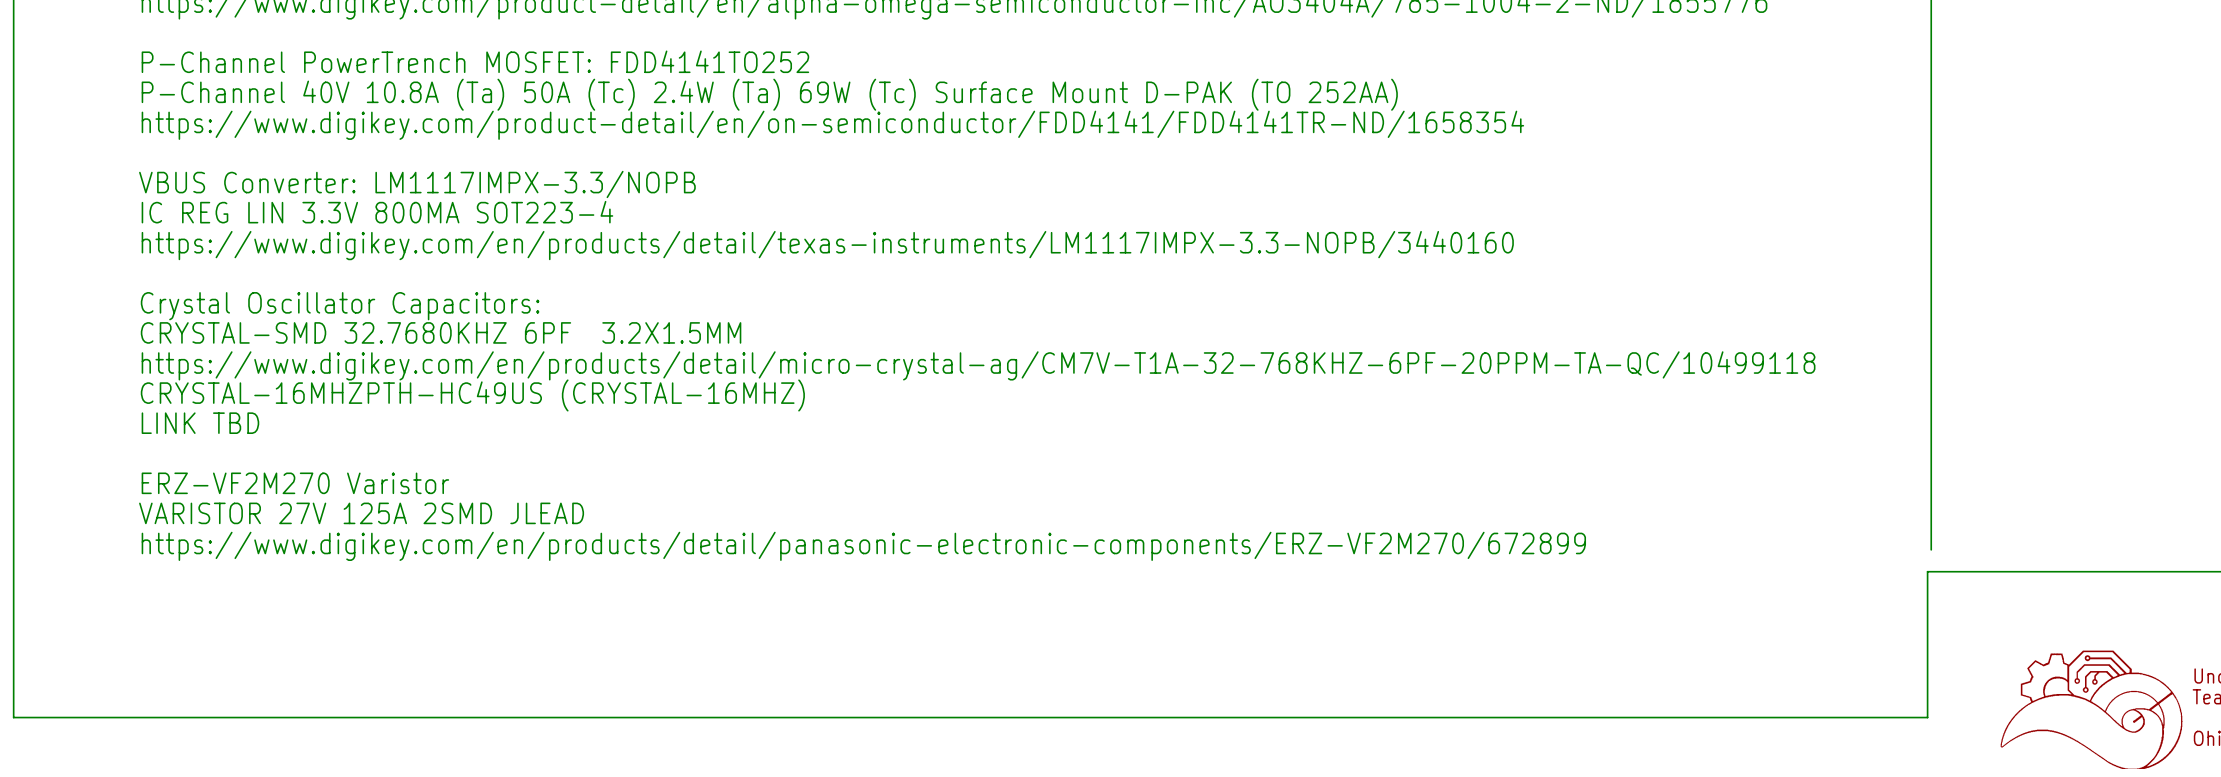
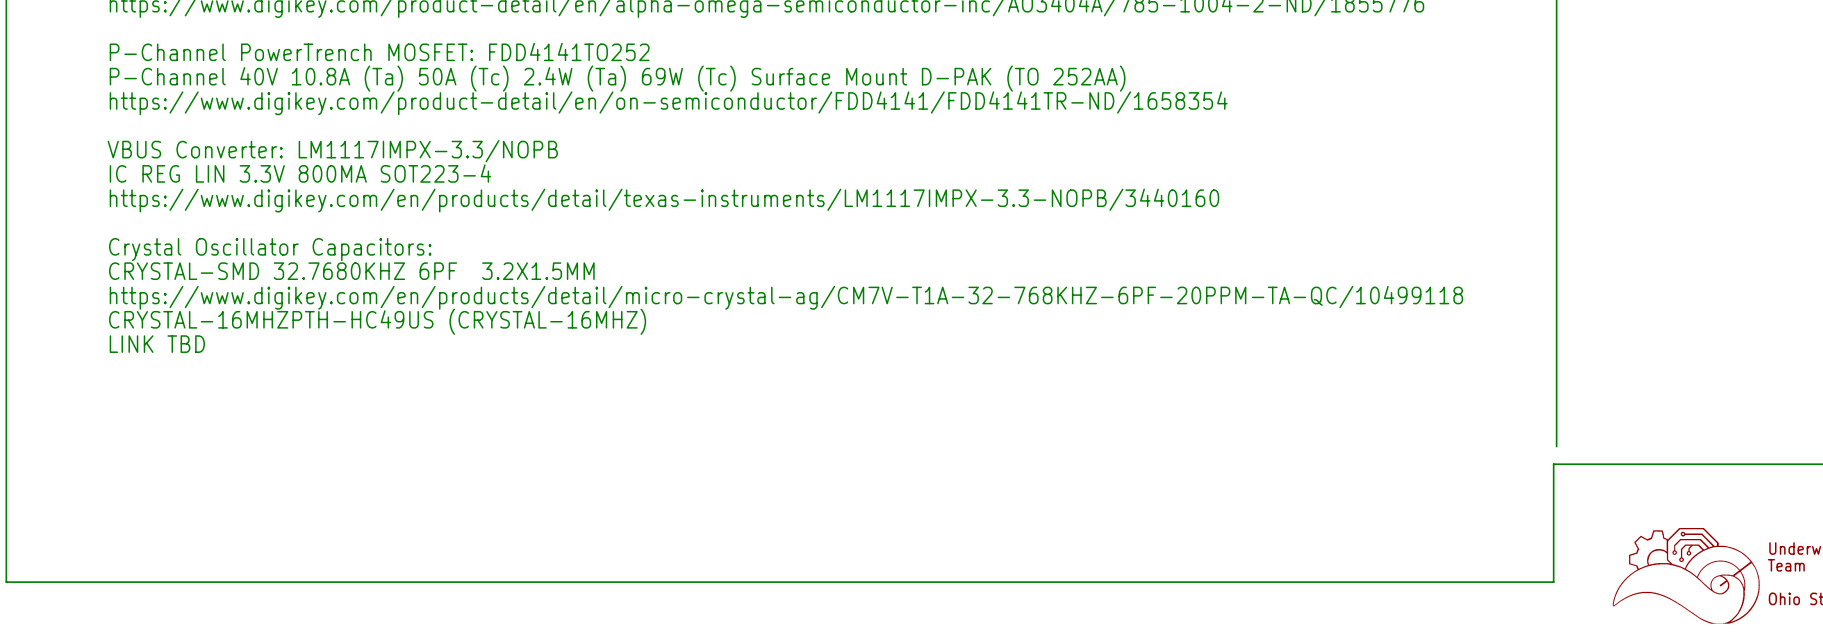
text: ERZ-VF2M270 Varistor (295, 483) -> none
text: VARISTOR 27V 125A 2SMD JLEAD (361, 513) -> none
text: https://www.digikey.com/en/products/detail/panasonic-electronic-components/ERZ-VF2M270/672899 (863, 546) -> none

